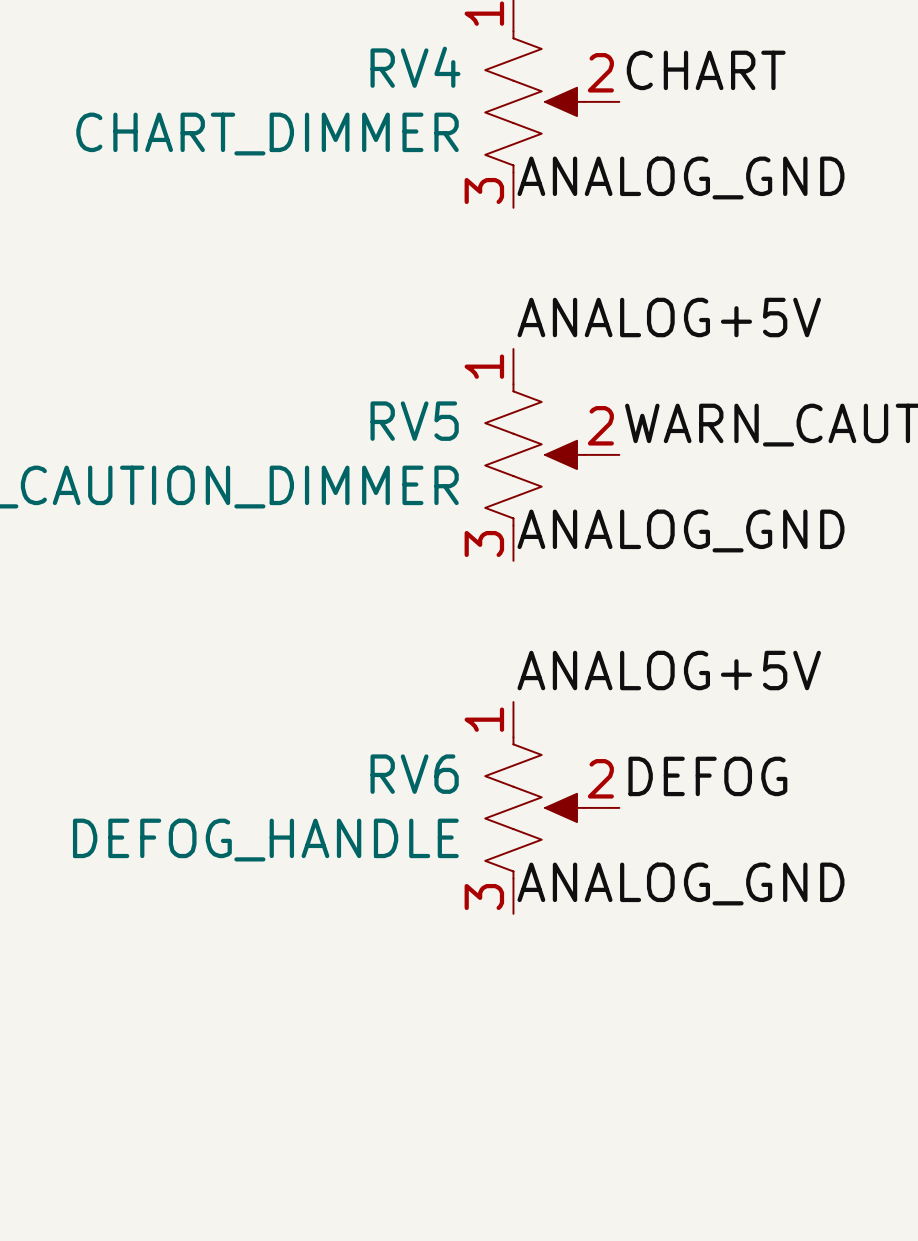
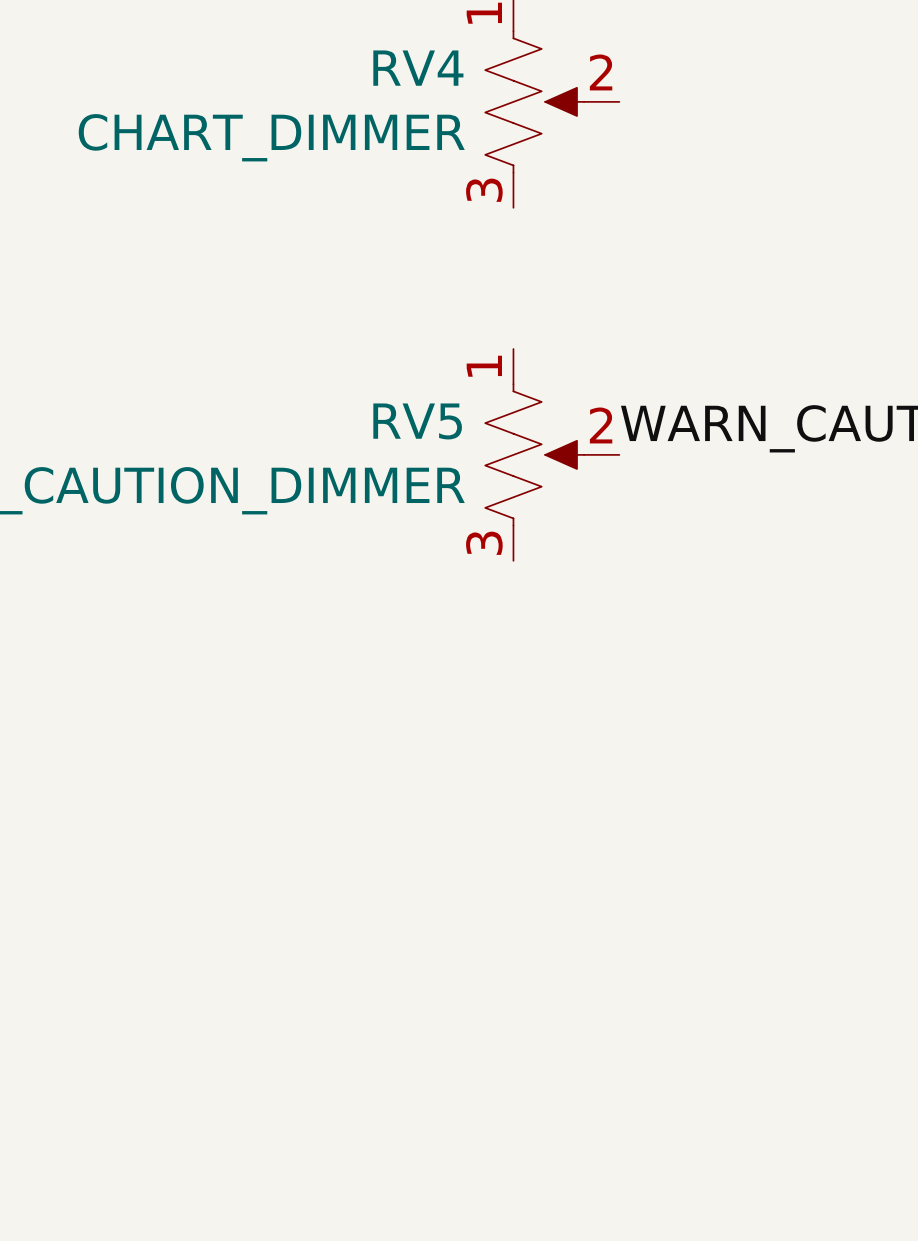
label: CHART (706, 70) -> none
label: ANALOG_GND (680, 177) -> none
label: ANALOG+5V (669, 317) -> none
label: ANALOG_GND (680, 530) -> none
label: ANALOG+5V (669, 670) -> none
label: DEFOG (707, 776) -> none
RV6: DEFOG_HANDLE (552, 807) -> none
label: ANALOG_GND (680, 884) -> none

